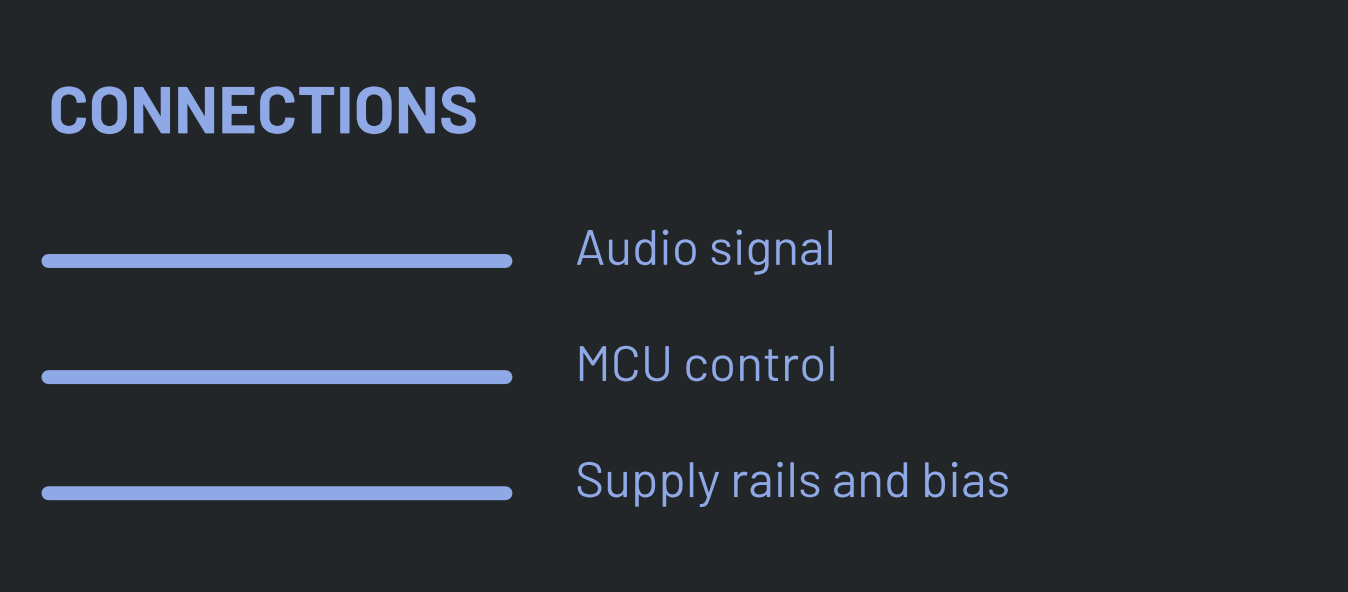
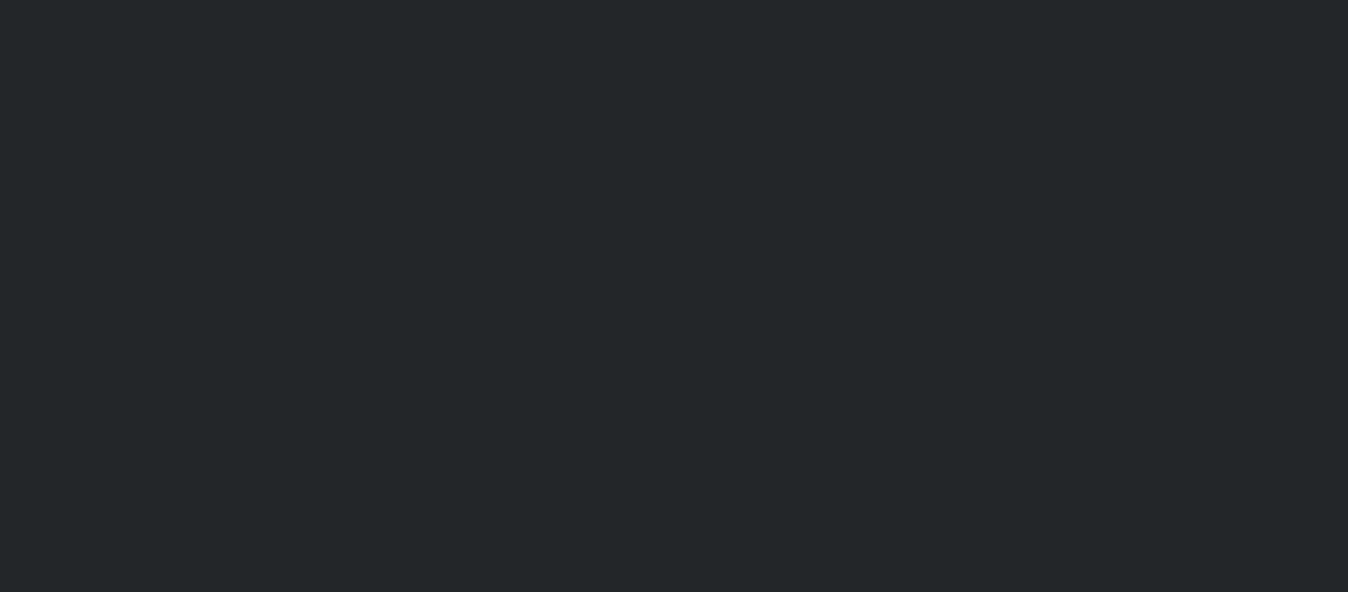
text: CONNECTIONS (263, 110) -> none
text: Audio signal (704, 252) -> none
line: (48, 260) (505, 260) -> none
text: MCU control (706, 363) -> none
line: (48, 377) (505, 377) -> none
text: Supply rails and bias (792, 484) -> none
line: (48, 493) (505, 493) -> none

